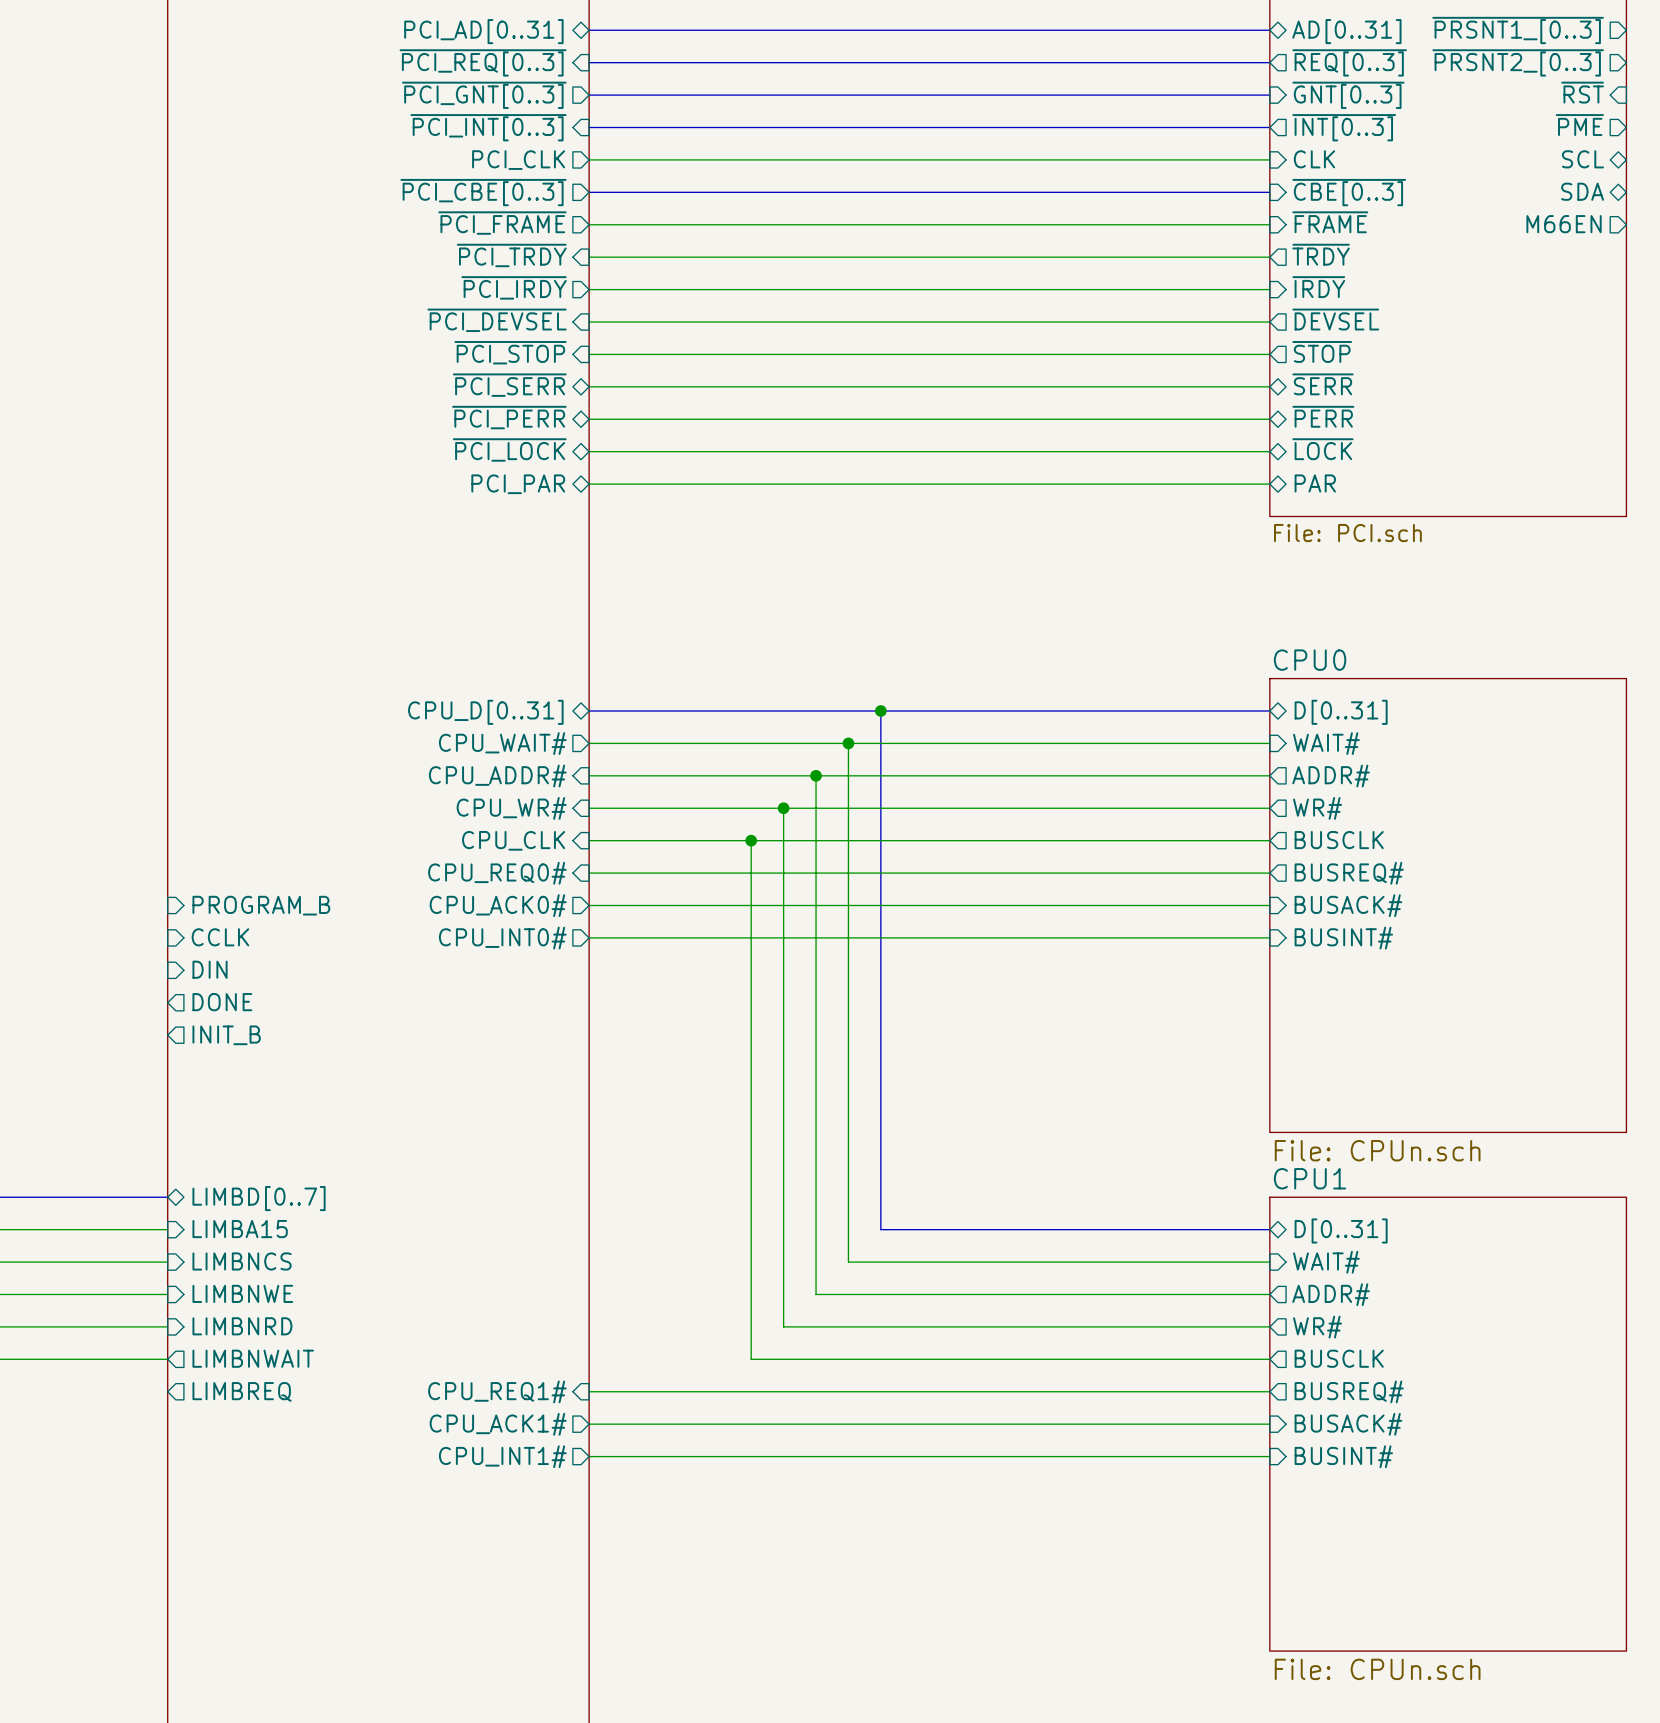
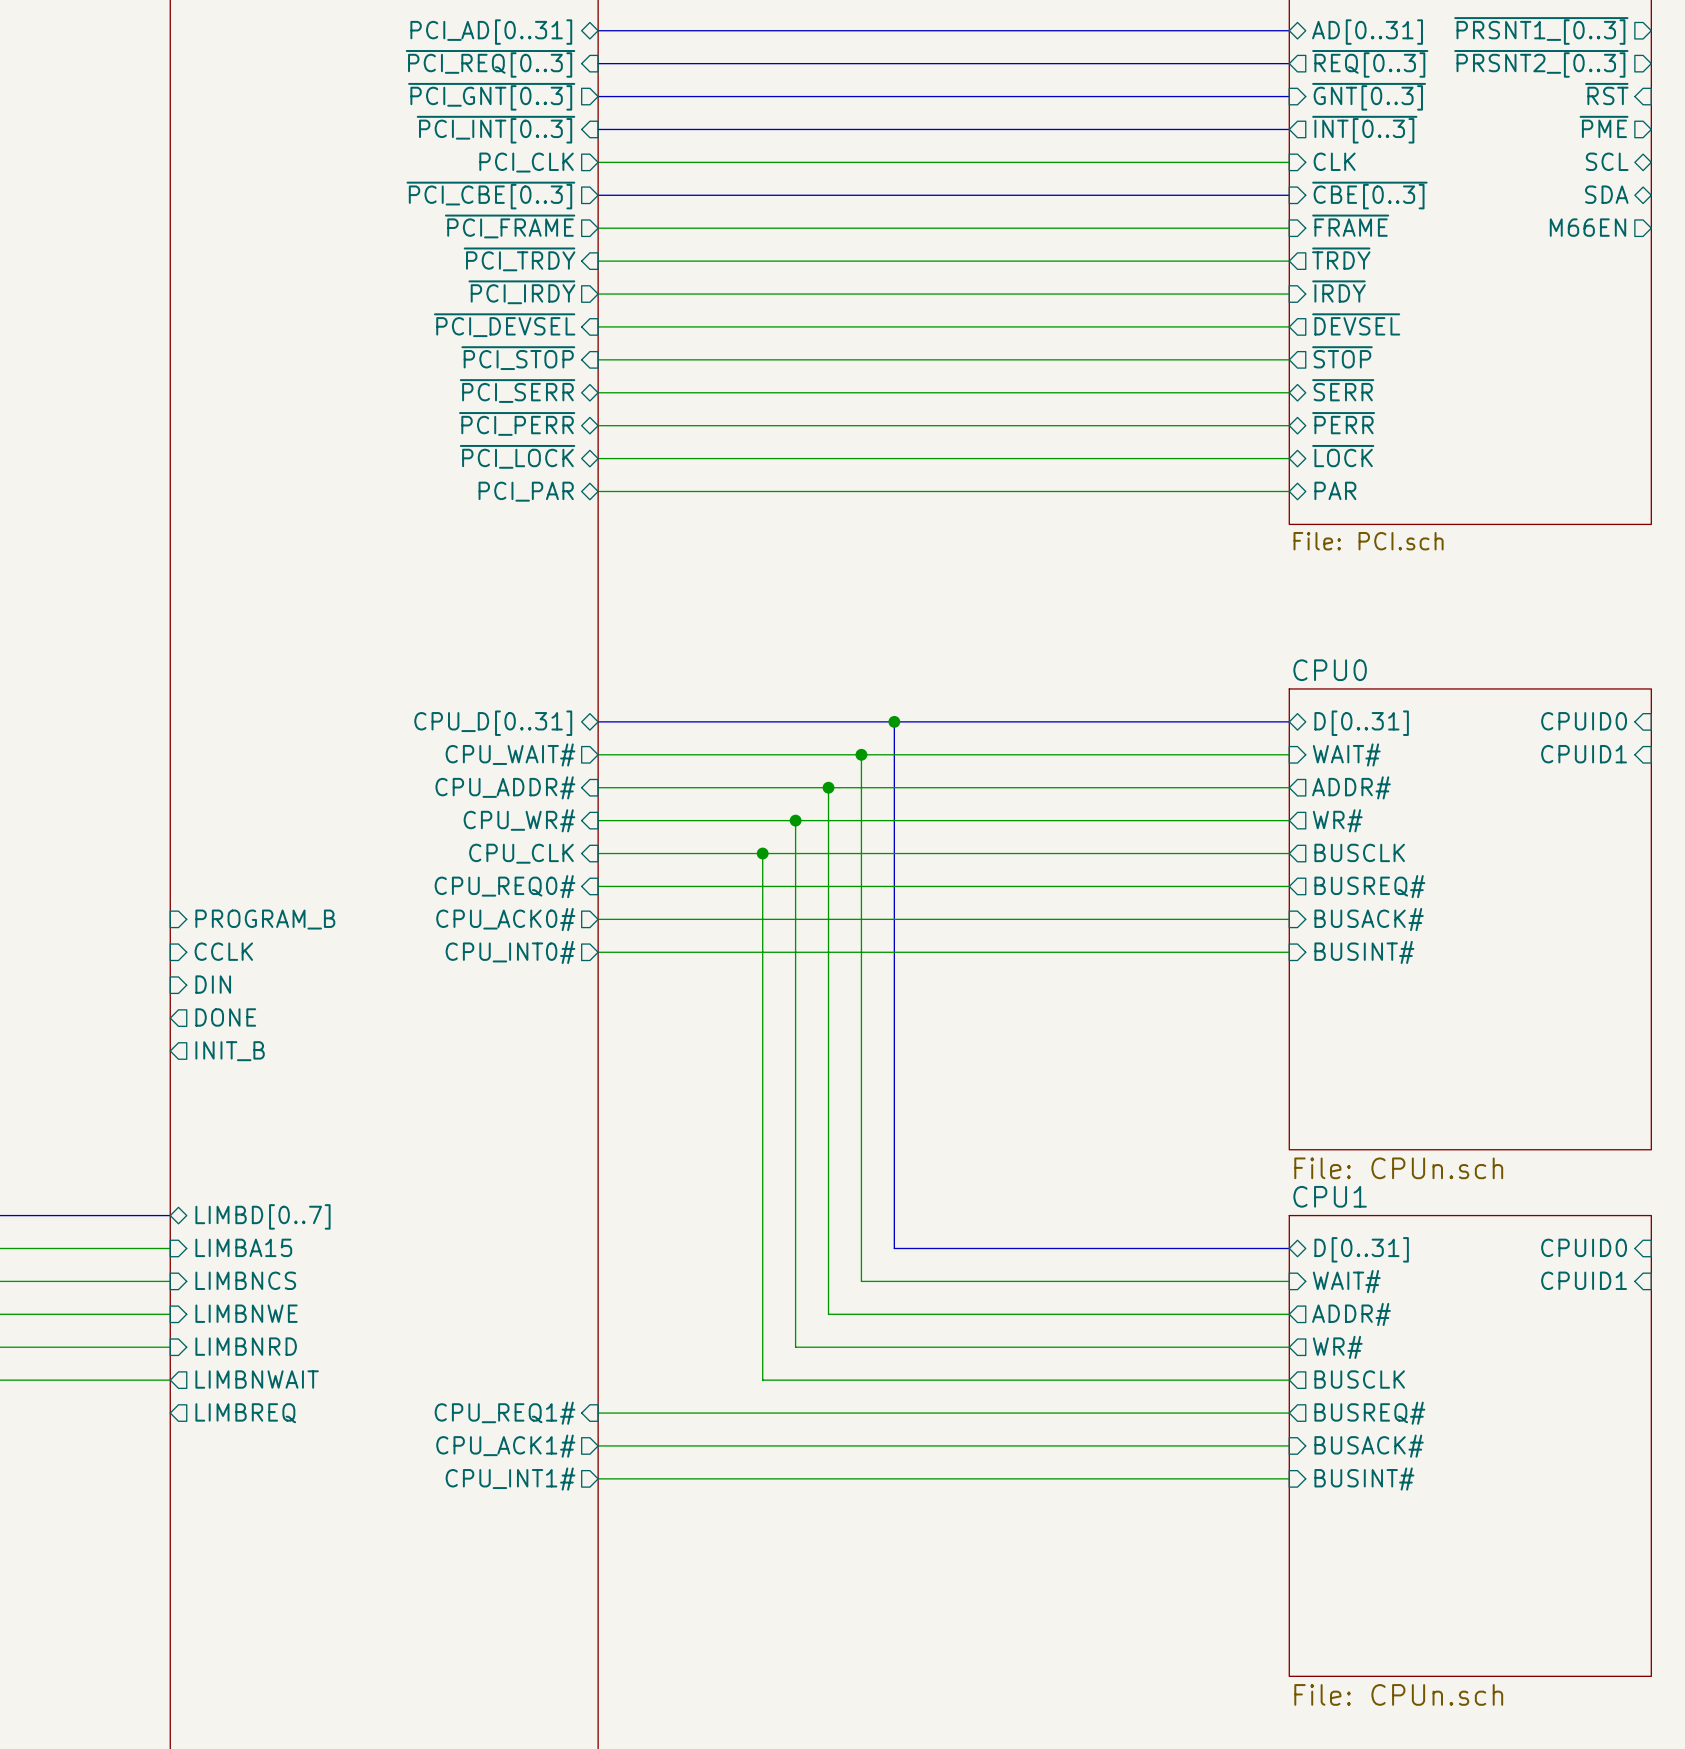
sheet pin: none -> CPUID0 (1584, 721)
sheet pin: none -> CPUID1 (1584, 754)
sheet pin: none -> CPUID0 (1584, 1247)
sheet pin: none -> CPUID1 (1584, 1280)

